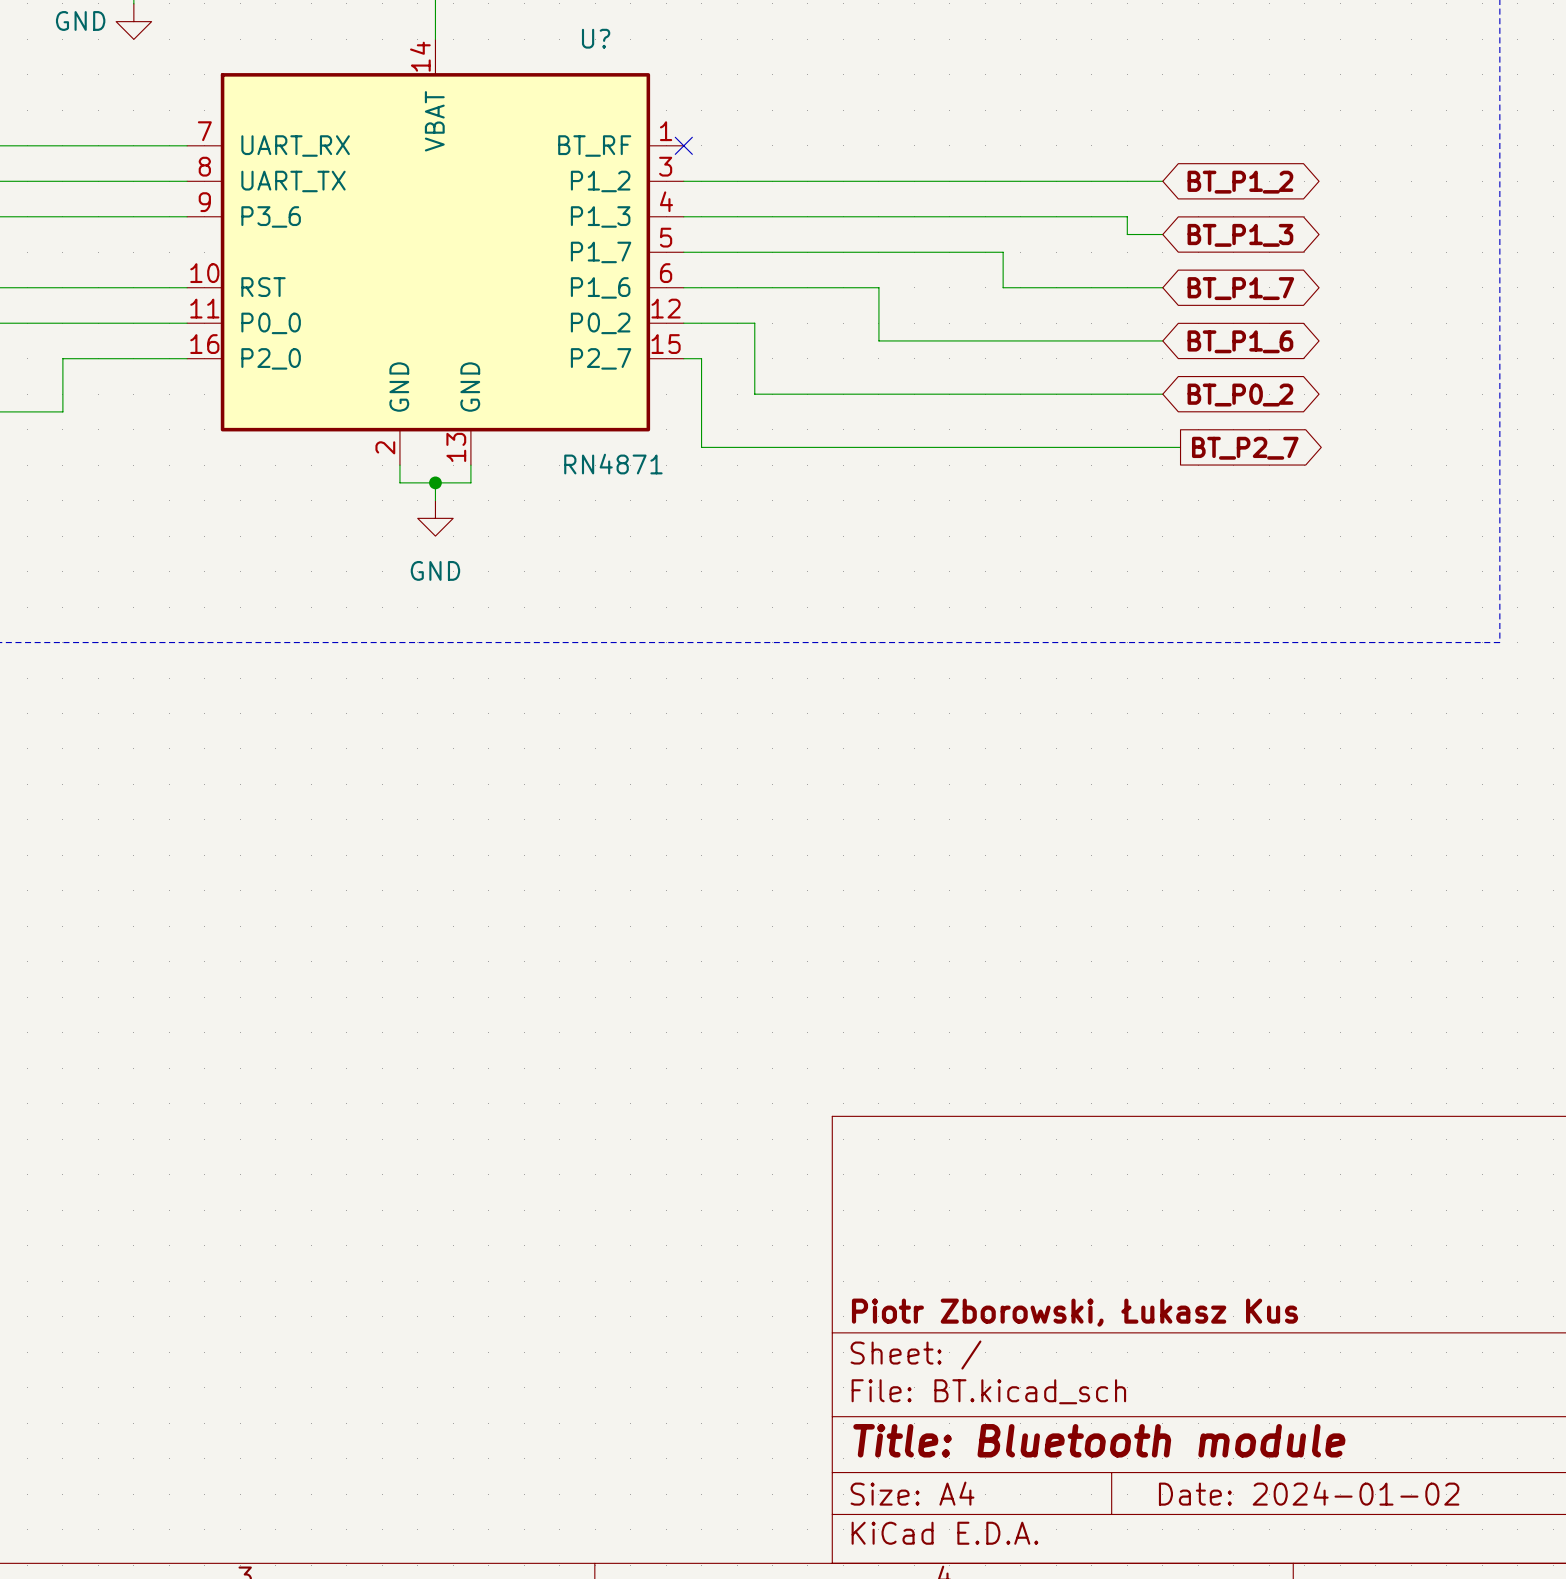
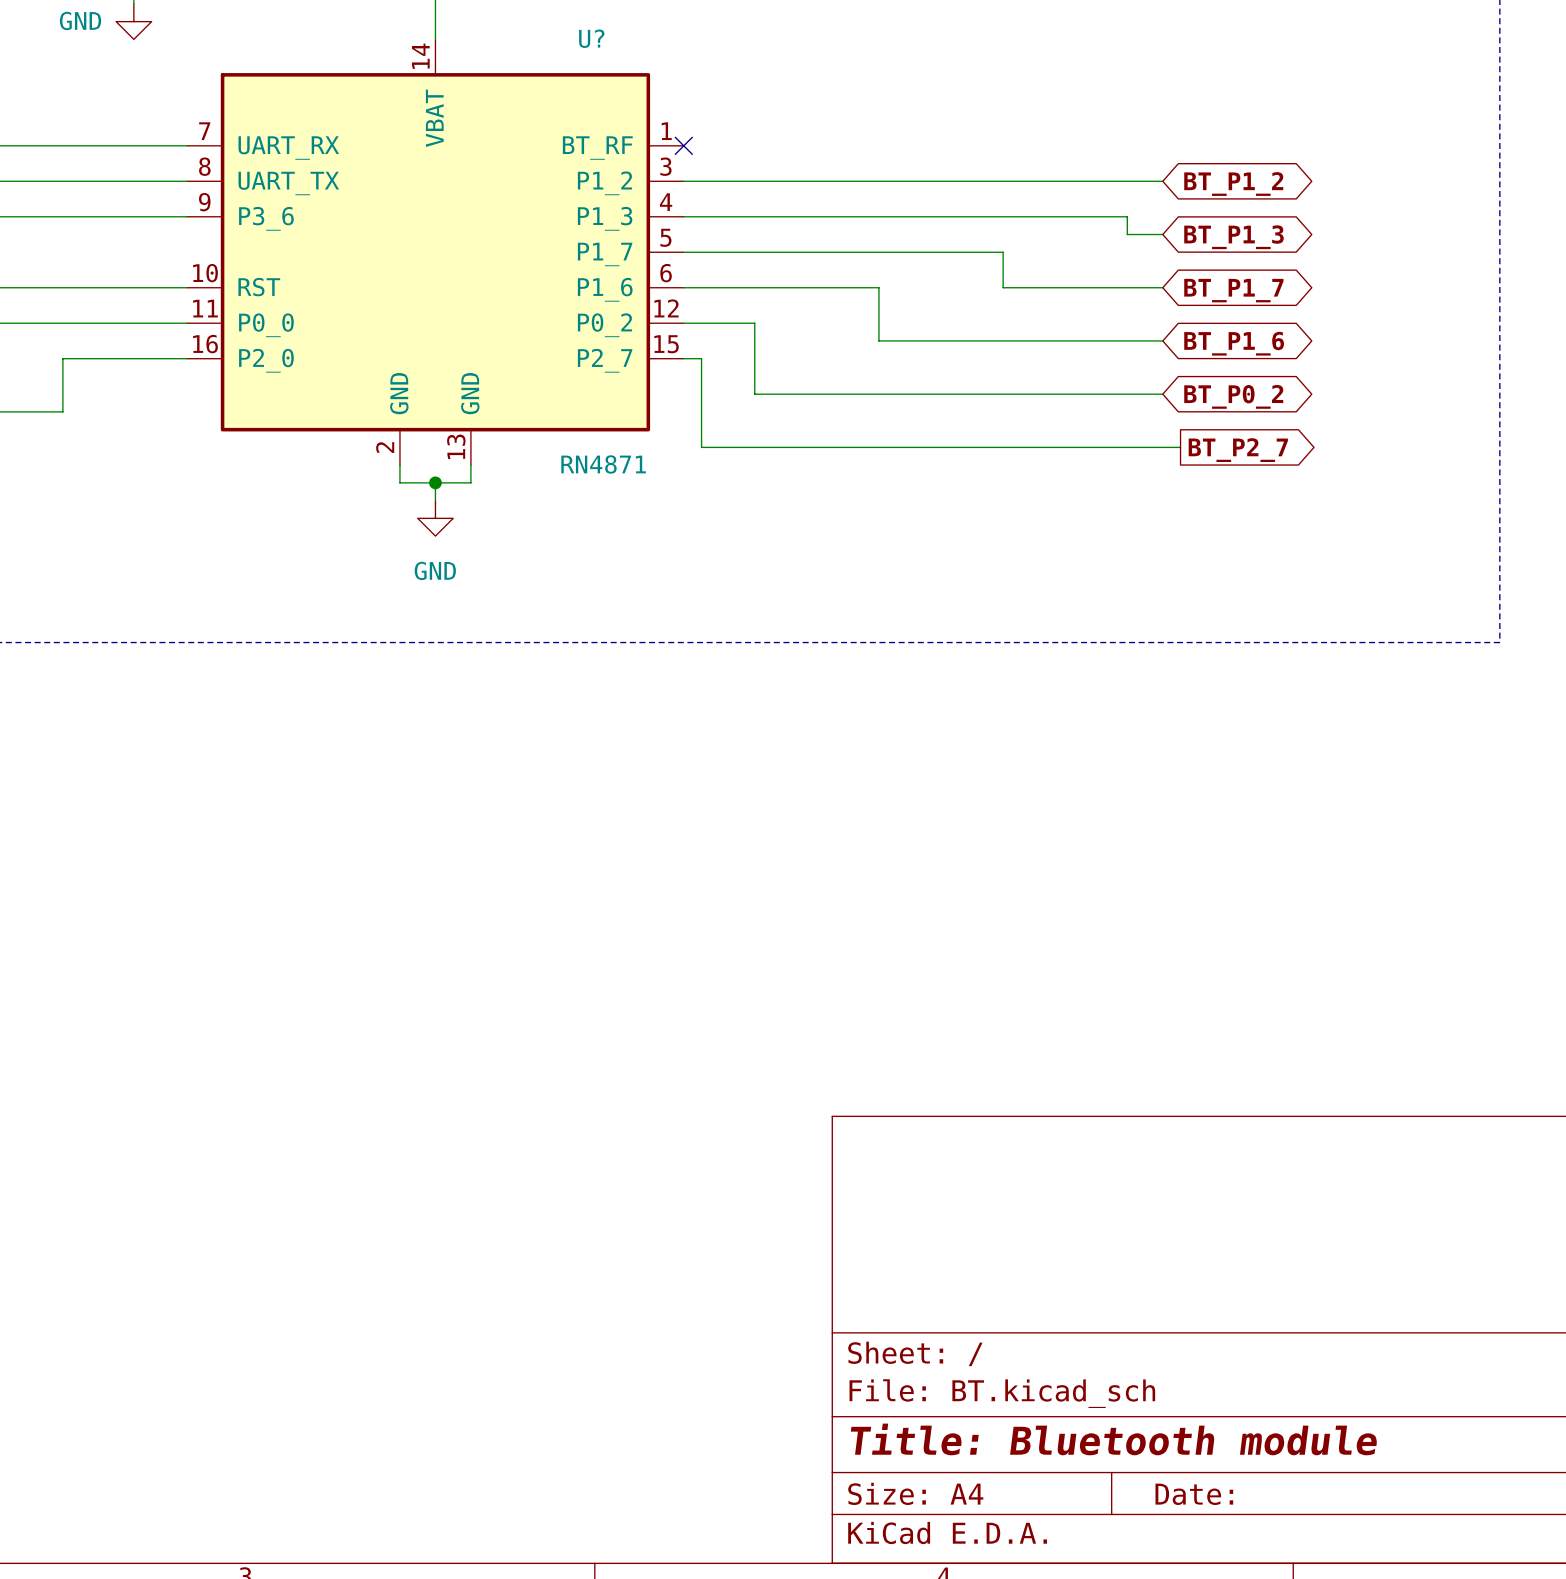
title block: Piotr Zborowski, Łukasz Kus (1075, 1312) -> none
title block: Date: 2024-01-02 (1309, 1493) -> Date: (1194, 1494)

